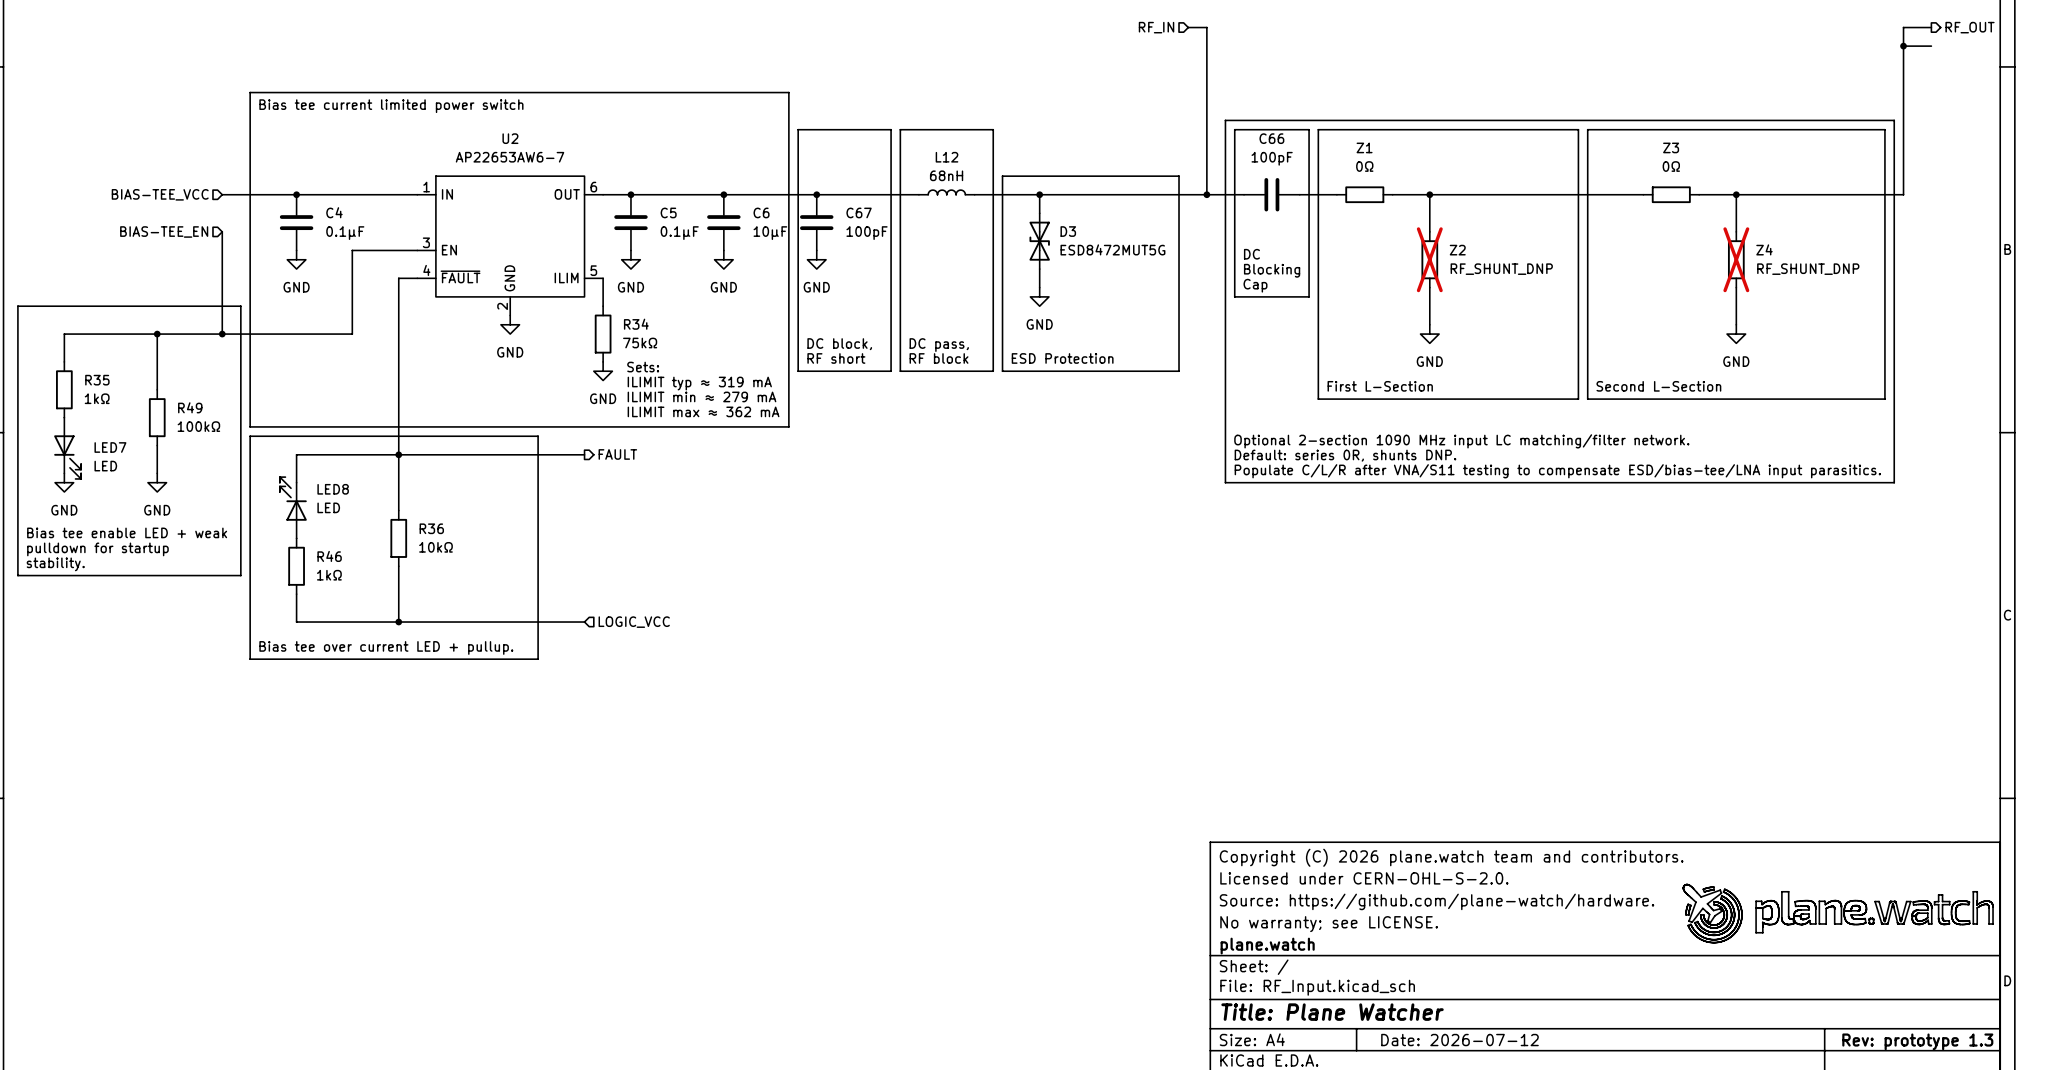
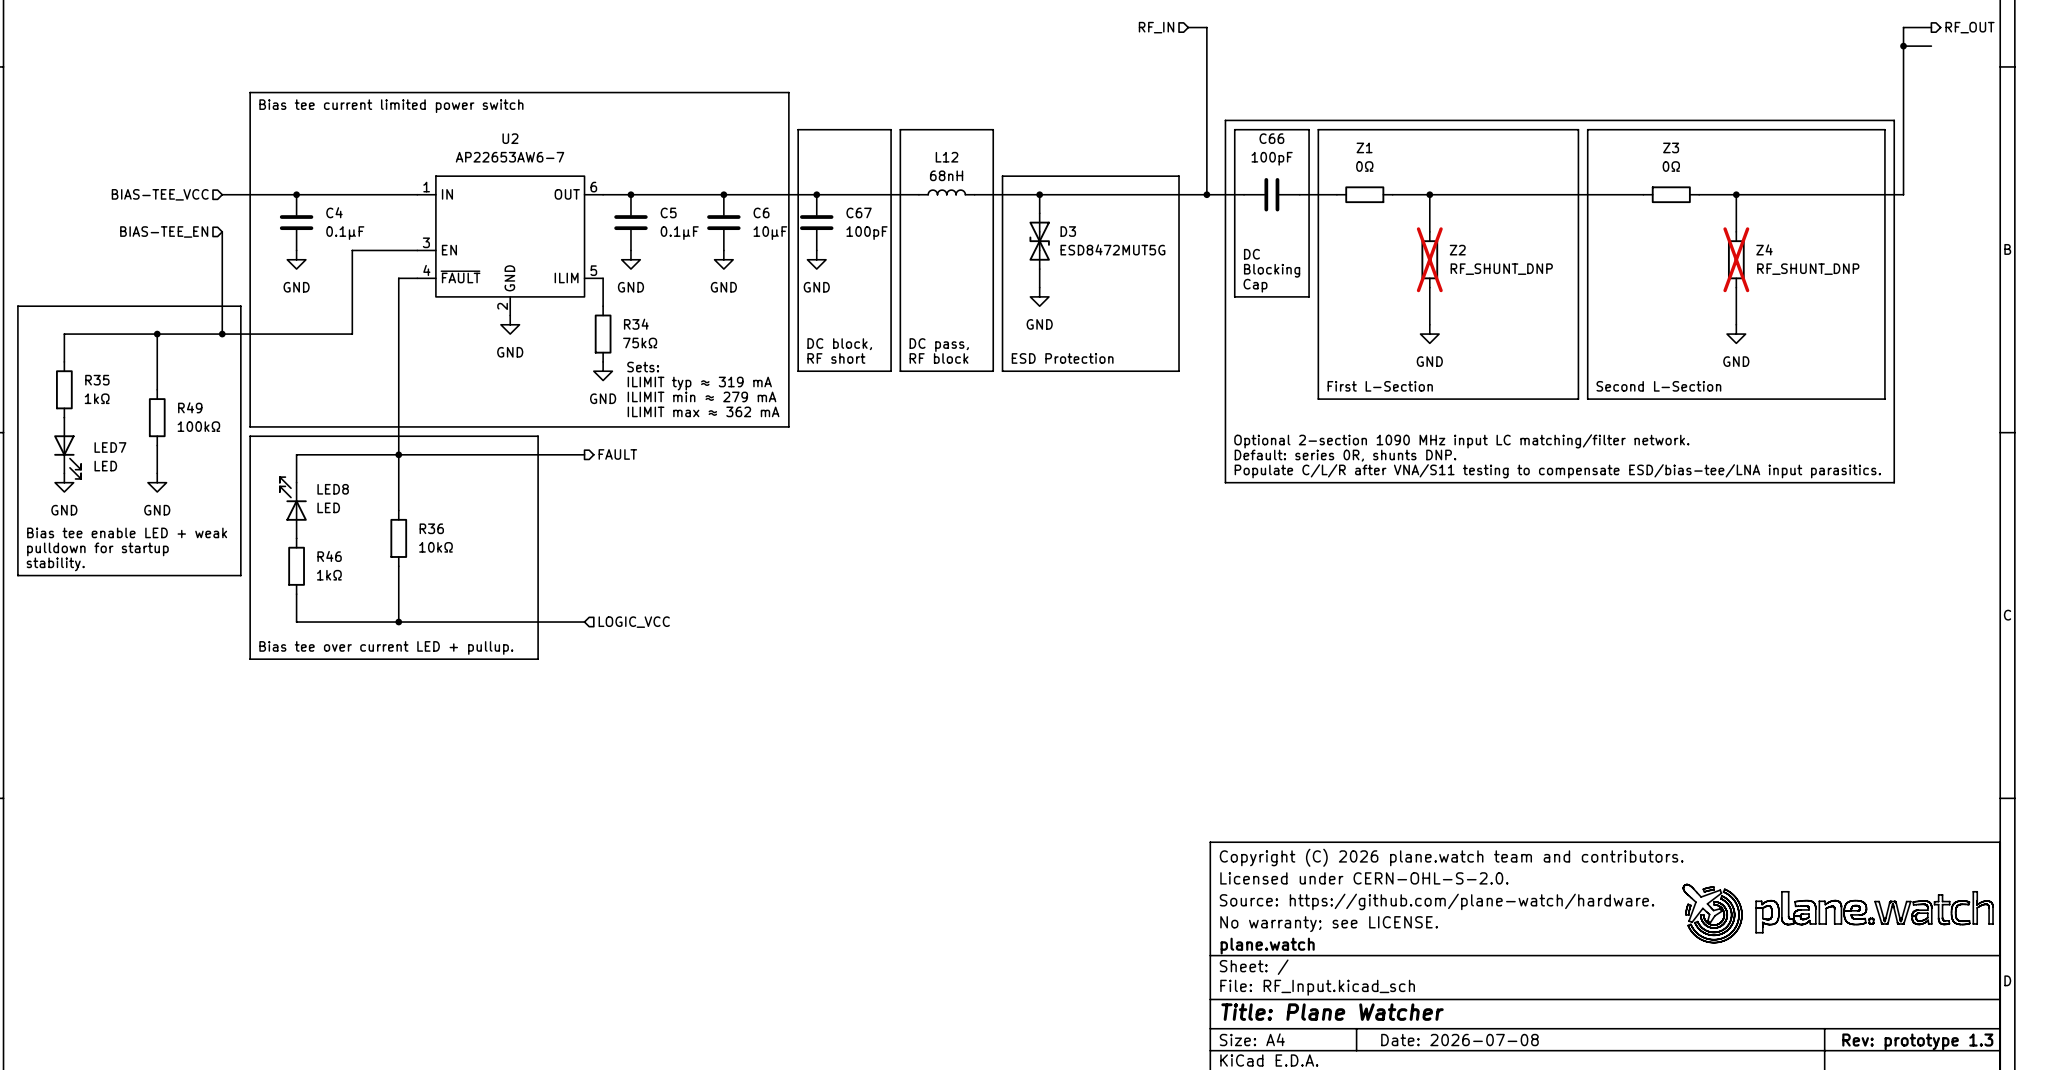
title block: Date: 2026-07-12 (1459, 1040) -> Date: 2026-07-08 (1459, 1040)

